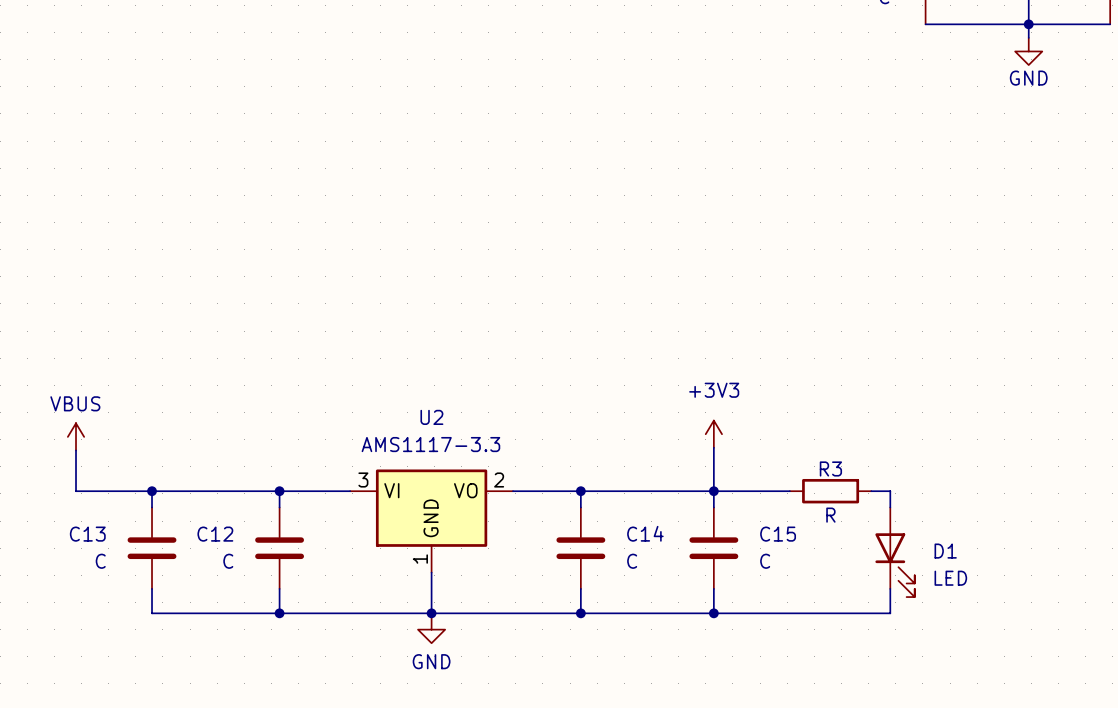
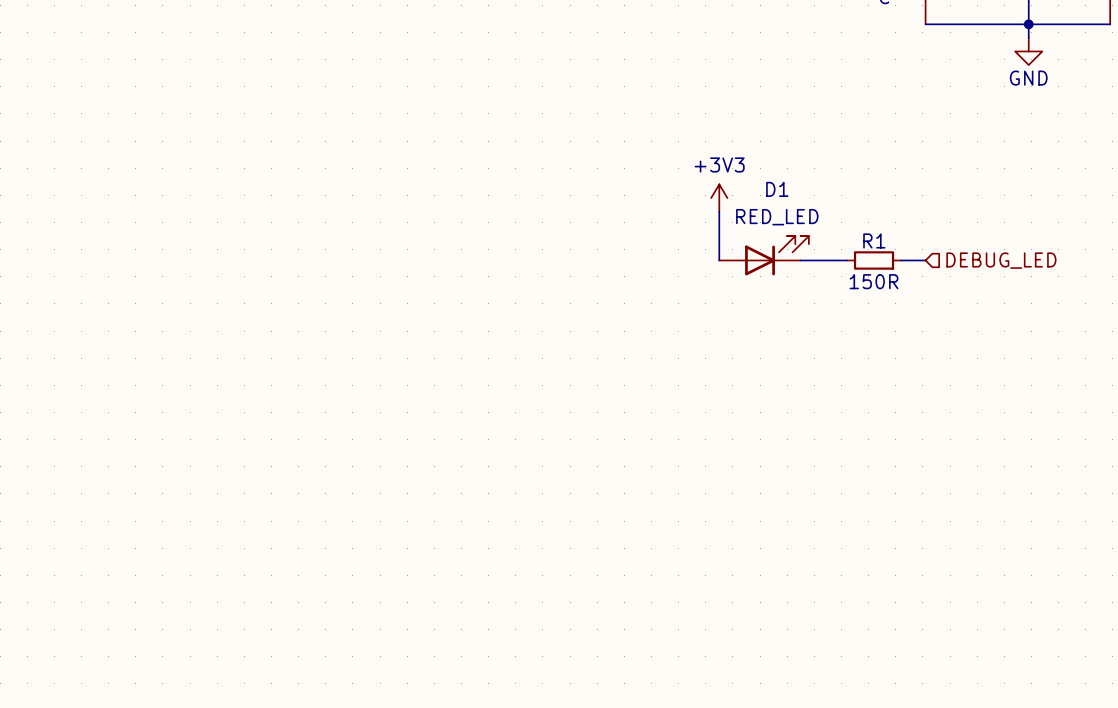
wire: none -> (719, 211) (719, 260)
wire: none -> (800, 260) (846, 260)
R1: none -> 150R (874, 260)
wire: none -> (901, 260) (925, 260)
hierarchical label: none -> DEBUG_LED (1001, 260)
power symbol text position: +3V3 (714, 390) -> +3V3 (719, 164)
power symbol position: +3V3 (713, 434) -> +3V3 (719, 198)
power symbol: VBUS (76, 436) -> none
wire: (713, 447) (713, 507) -> none
wire: (76, 450) (76, 491) (350, 491) -> none
wire: (152, 491) (152, 507) -> none
junction: (152, 491) -> none
wire: (279, 491) (279, 507) -> none
junction: (279, 491) -> none
wire: (513, 491) (789, 491) -> none
wire: (580, 491) (580, 507) -> none
junction: (580, 491) -> none
junction: (713, 491) -> none
R3: R (830, 491) -> none
wire: (871, 491) (890, 491) (890, 507) -> none
U2: AMS1117-3.3 (431, 521) -> none
C13: C (152, 548) -> none
C12: C (279, 548) -> none
C14: C (580, 548) -> none
C15: C (713, 548) -> none
D1 position: (895, 552) -> (764, 255)
D1 rotation: 0° (895, 565) -> 90° counterclockwise (776, 255)
wire: (431, 572) (431, 616) -> none
D1 value: LED (950, 578) -> RED_LED (777, 217)
wire: (152, 588) (152, 613) (890, 613) (890, 588) -> none
wire: (279, 588) (279, 613) -> none
wire: (580, 588) (580, 613) -> none
wire: (713, 588) (713, 613) -> none
junction: (279, 613) -> none
junction: (431, 613) -> none
junction: (580, 613) -> none
junction: (713, 613) -> none
power symbol: GND (431, 629) -> none

